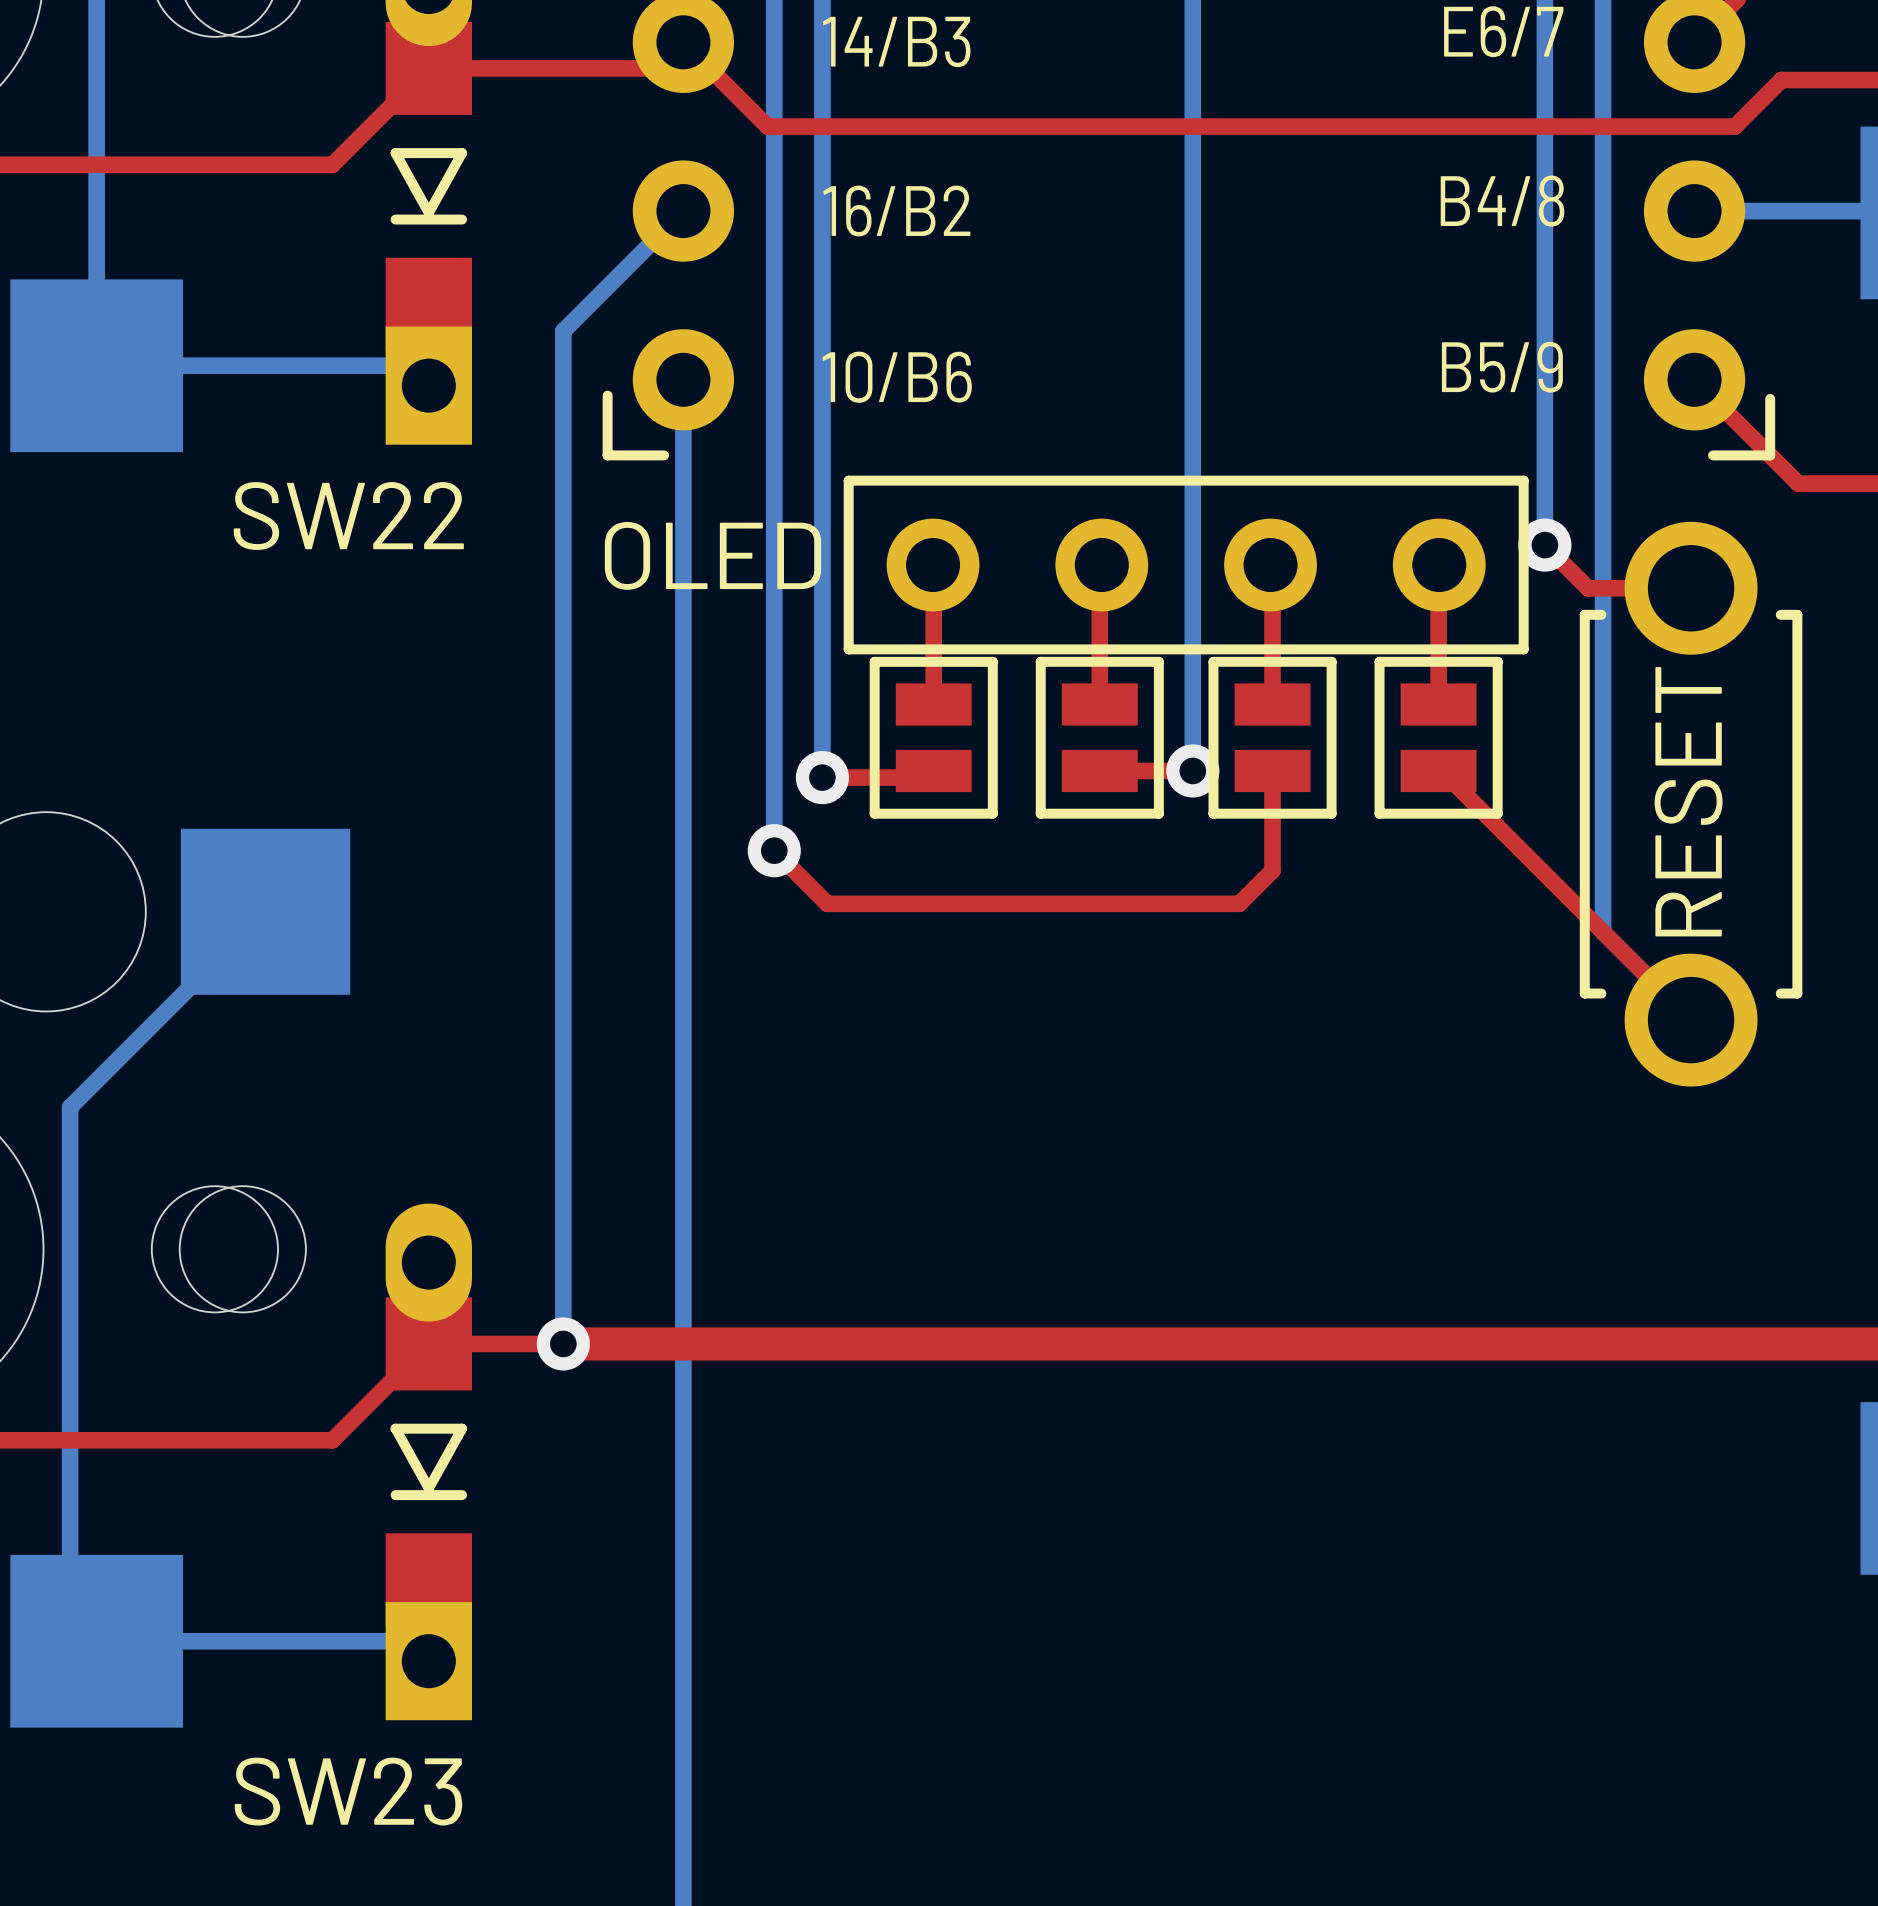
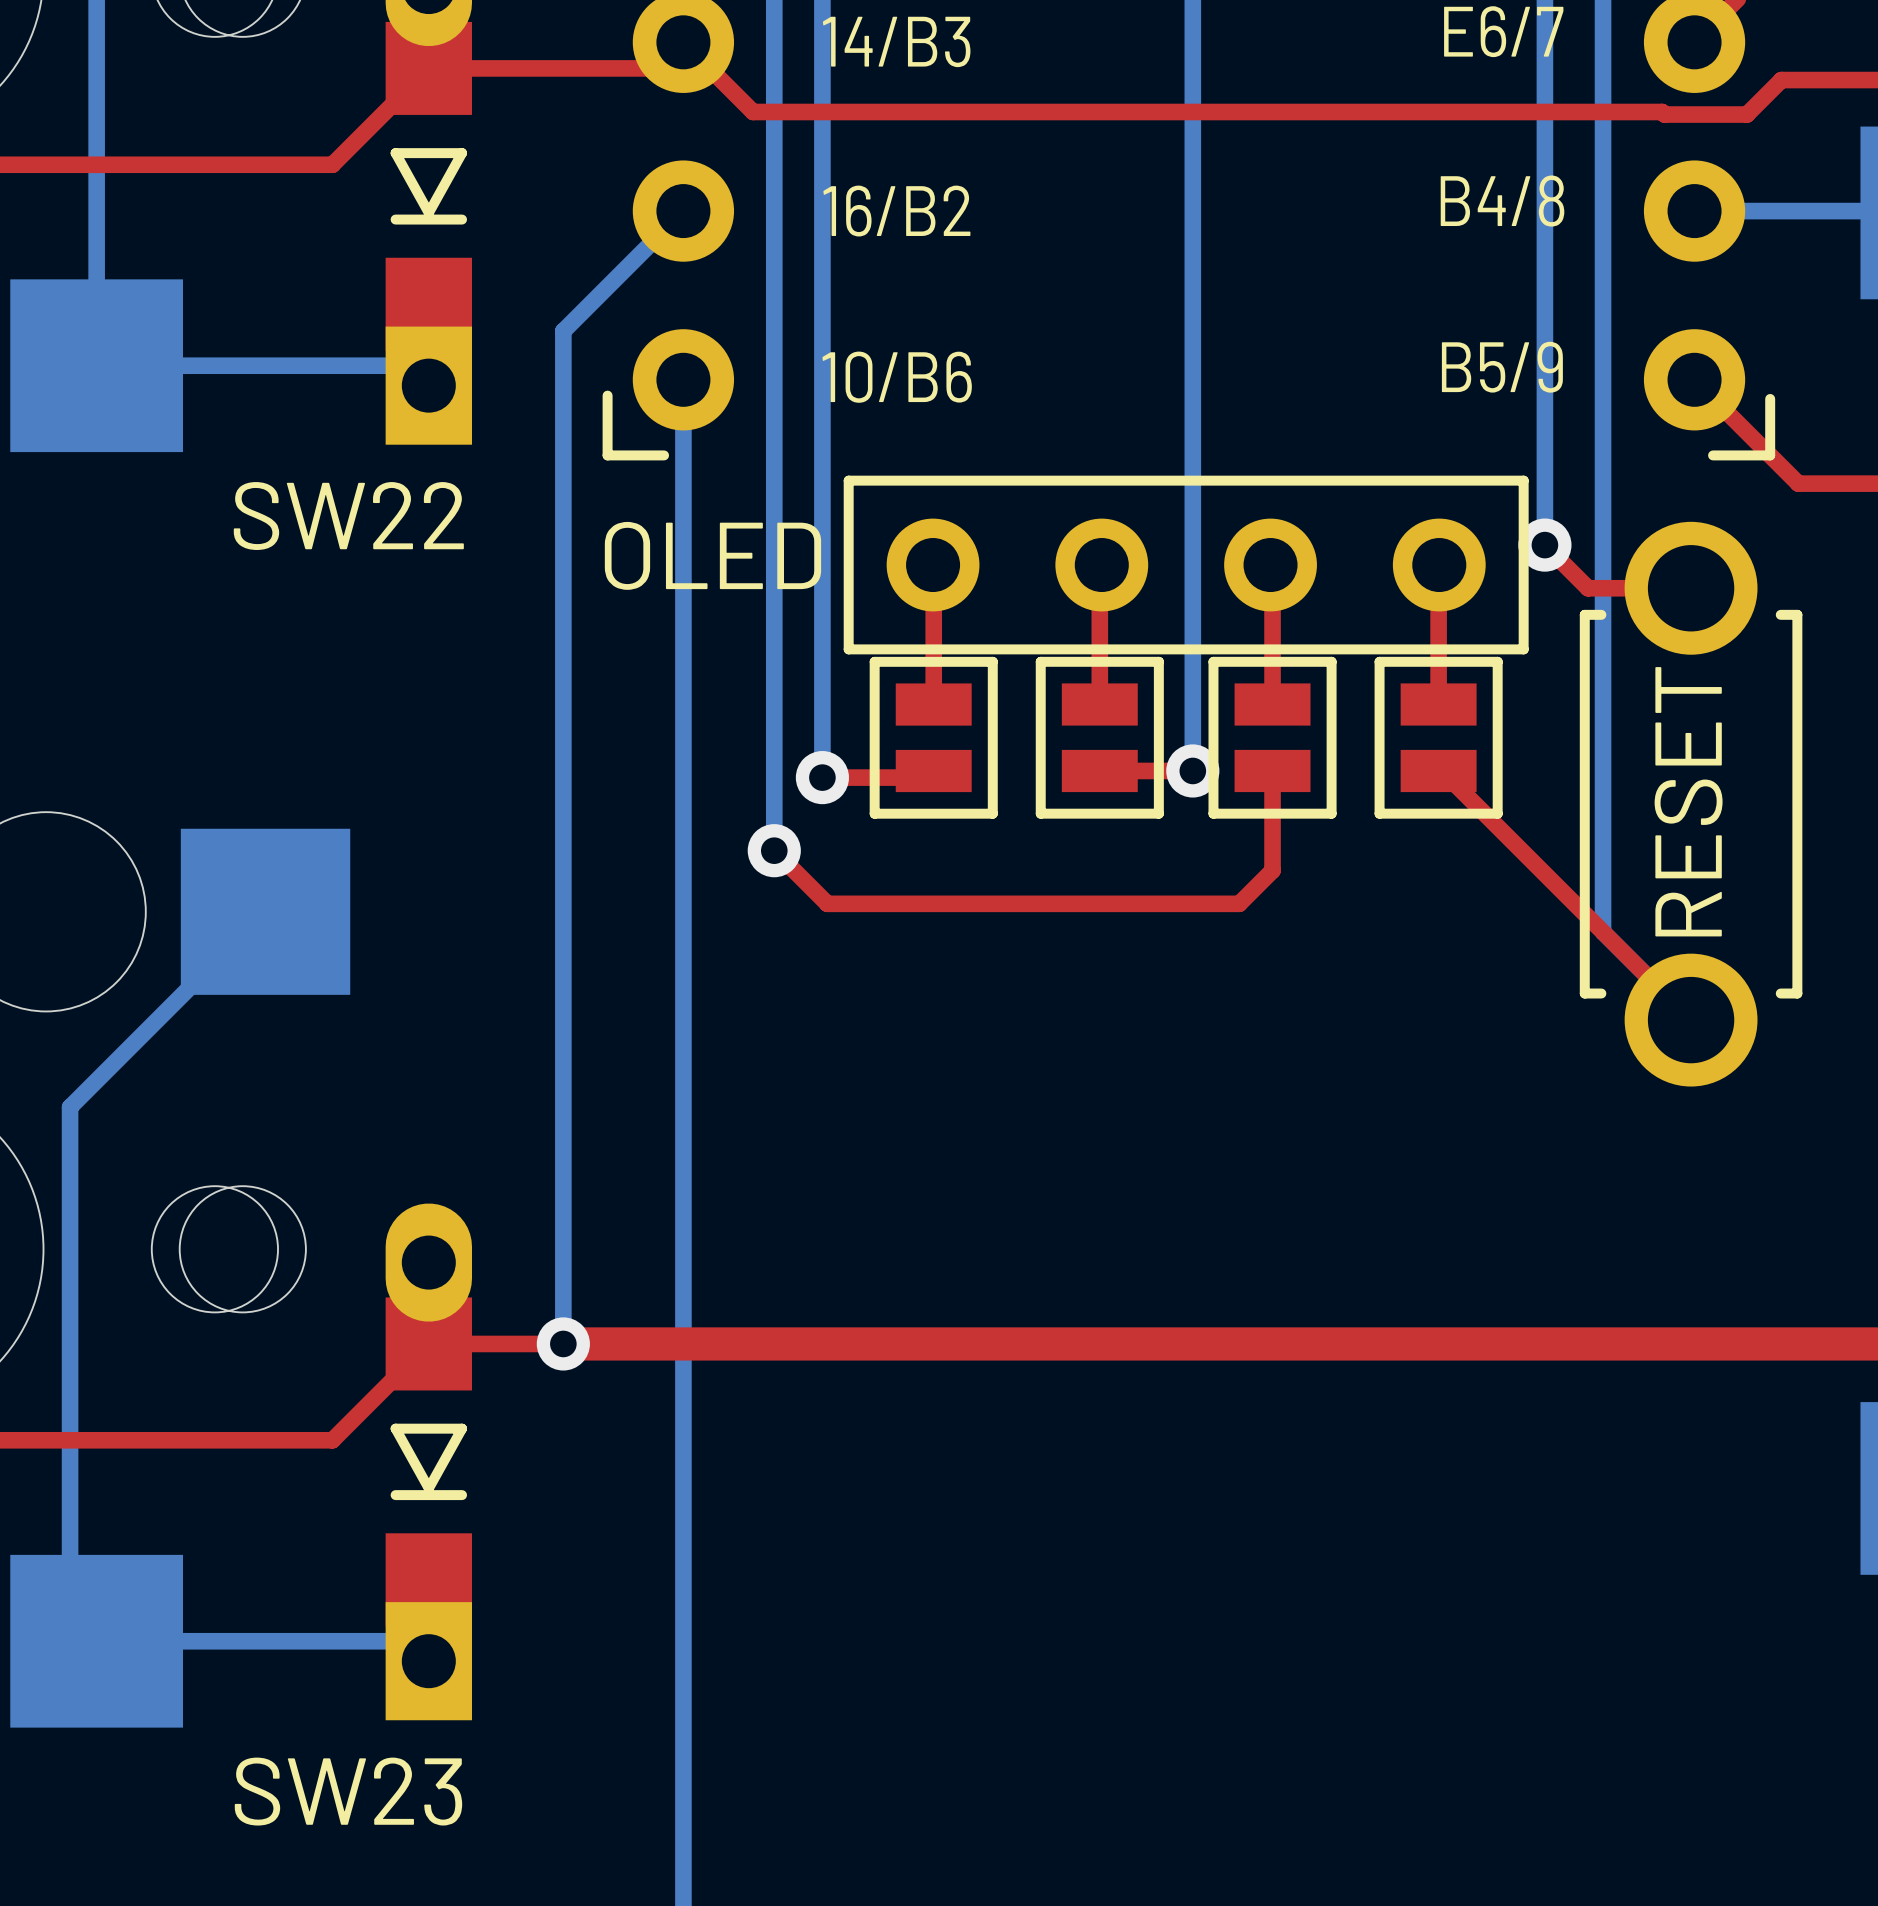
top track: (753, 112) (767, 126) (1734, 126) (1746, 114) -> (753, 112) (1662, 112) (1664, 114) (1746, 114)

